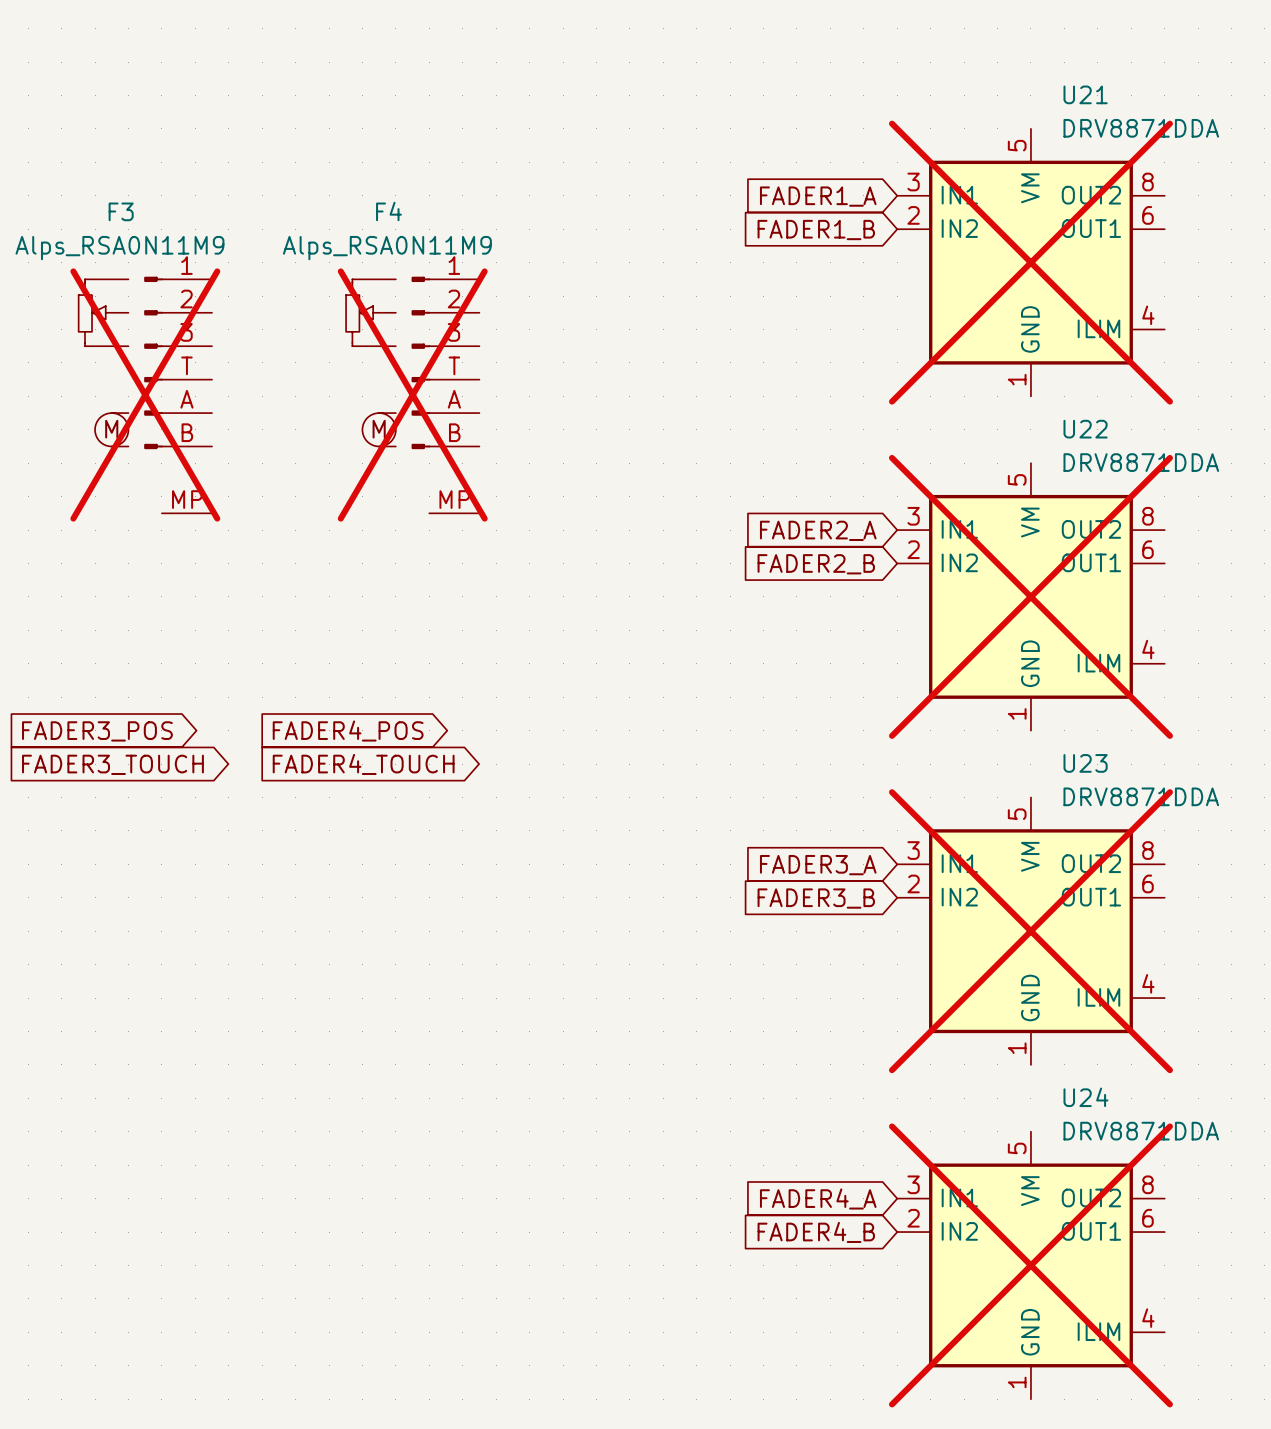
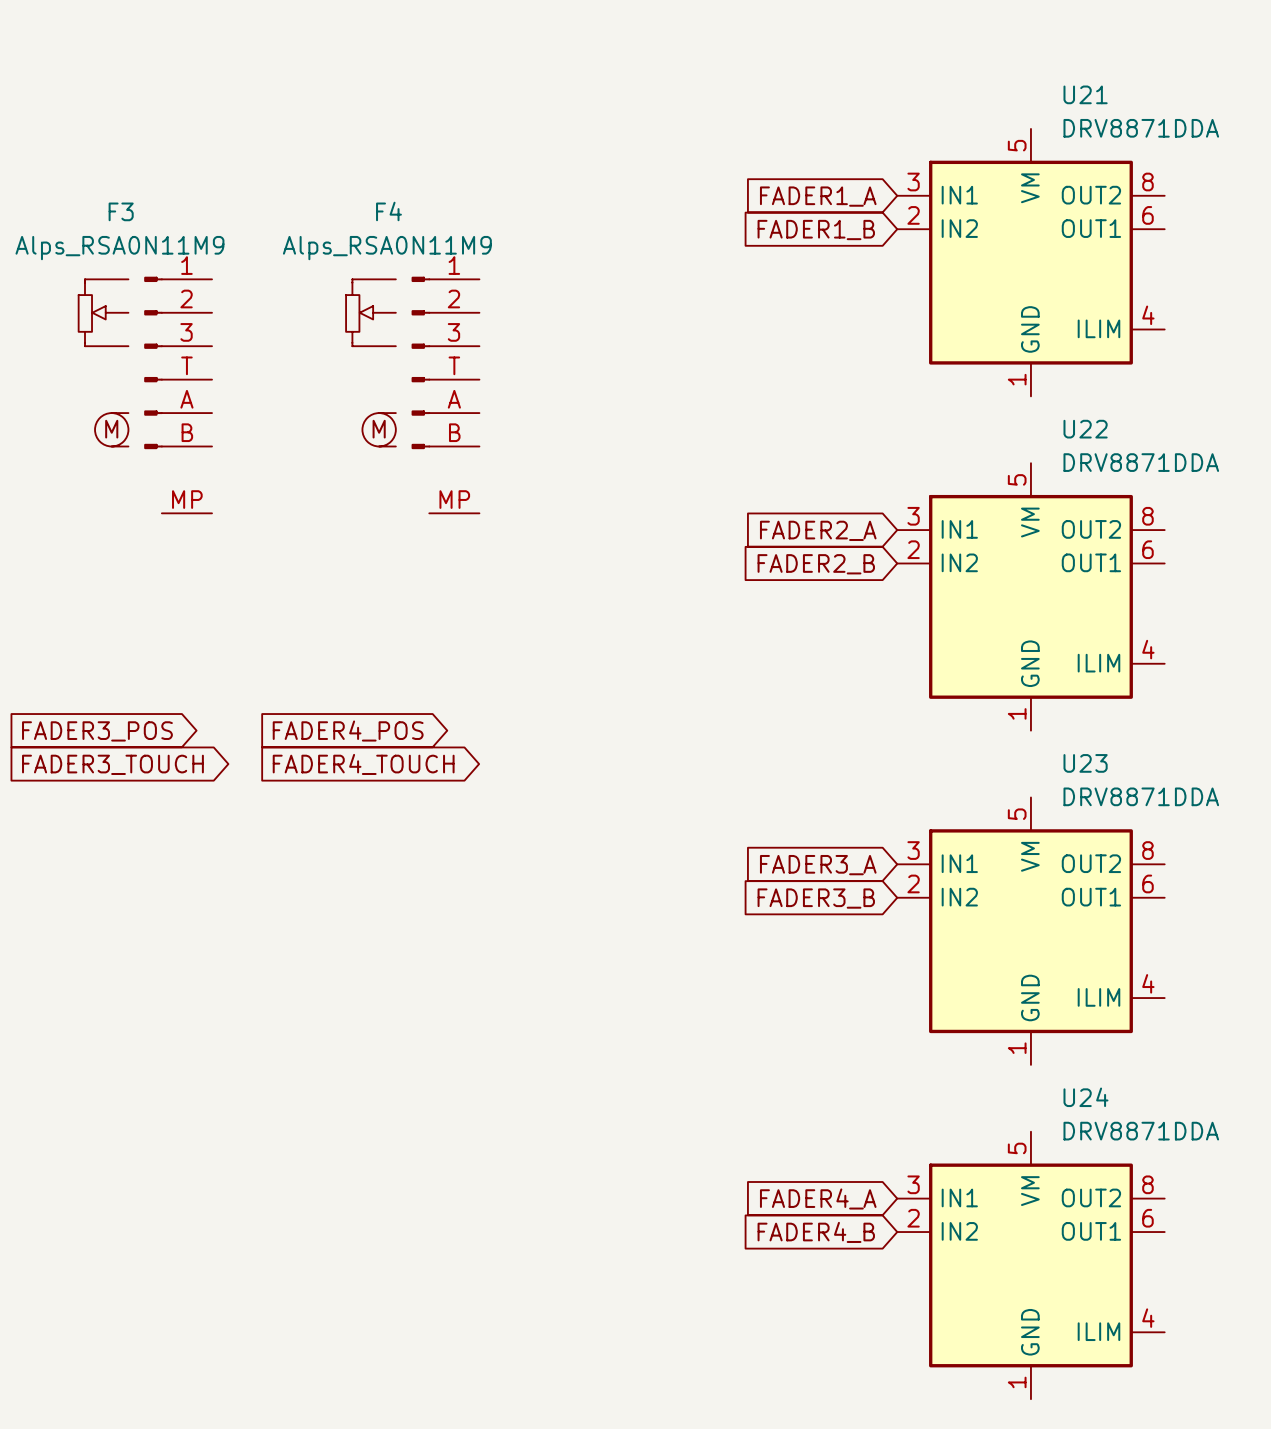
U21 do-not-place cross: (1030, 262) -> none
F3 do-not-place cross: (145, 395) -> none
F4 do-not-place cross: (412, 395) -> none
U22 do-not-place cross: (1030, 596) -> none
U23 do-not-place cross: (1030, 931) -> none
U24 do-not-place cross: (1030, 1265) -> none

